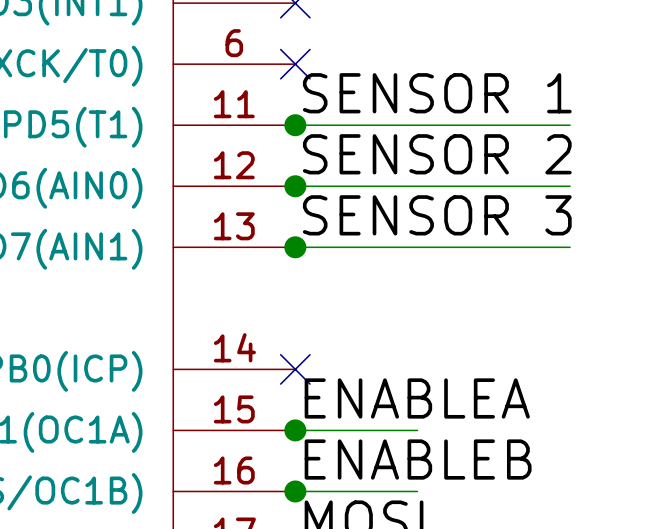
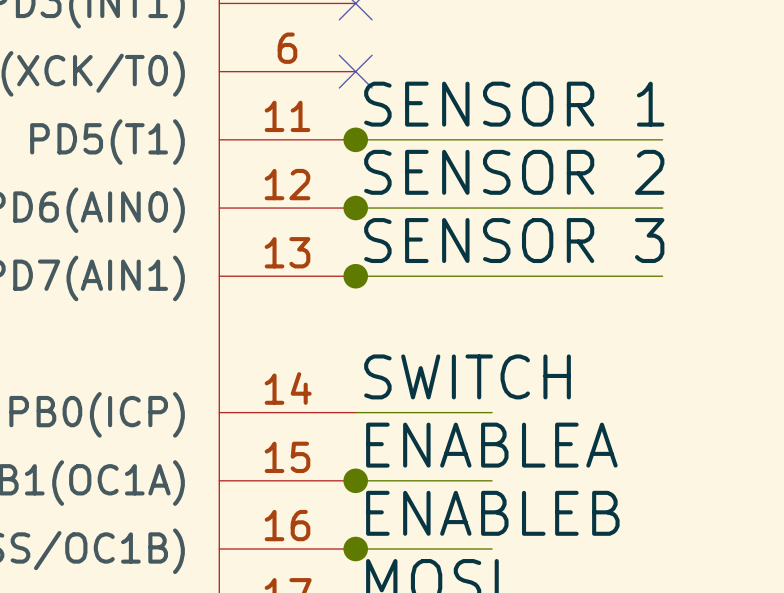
label: none -> SWITCH (467, 376)
wire: none -> (355, 412) (492, 412)
no-connect mark: (295, 369) -> none

